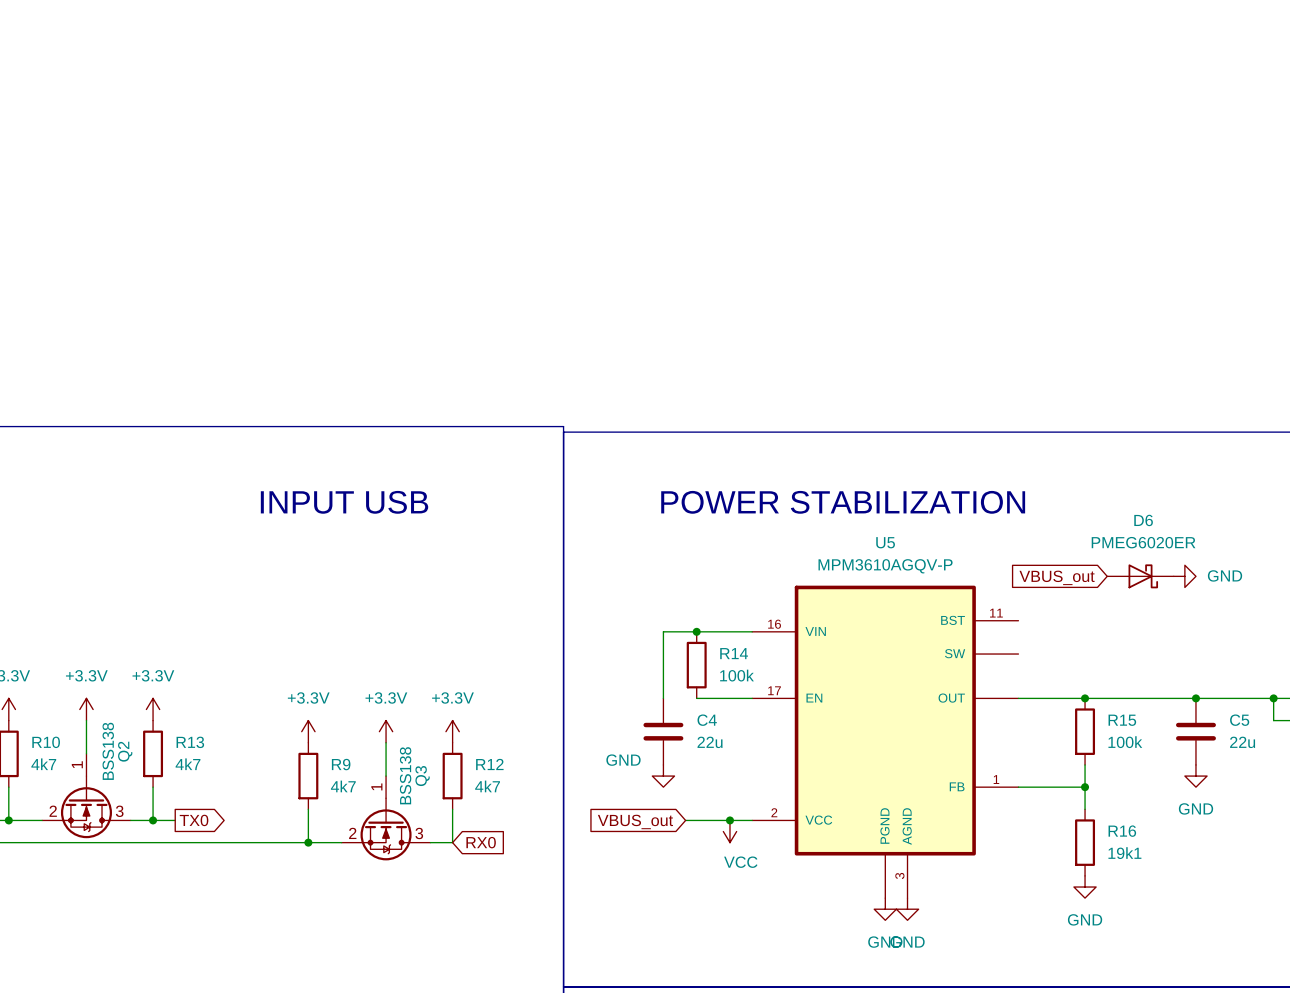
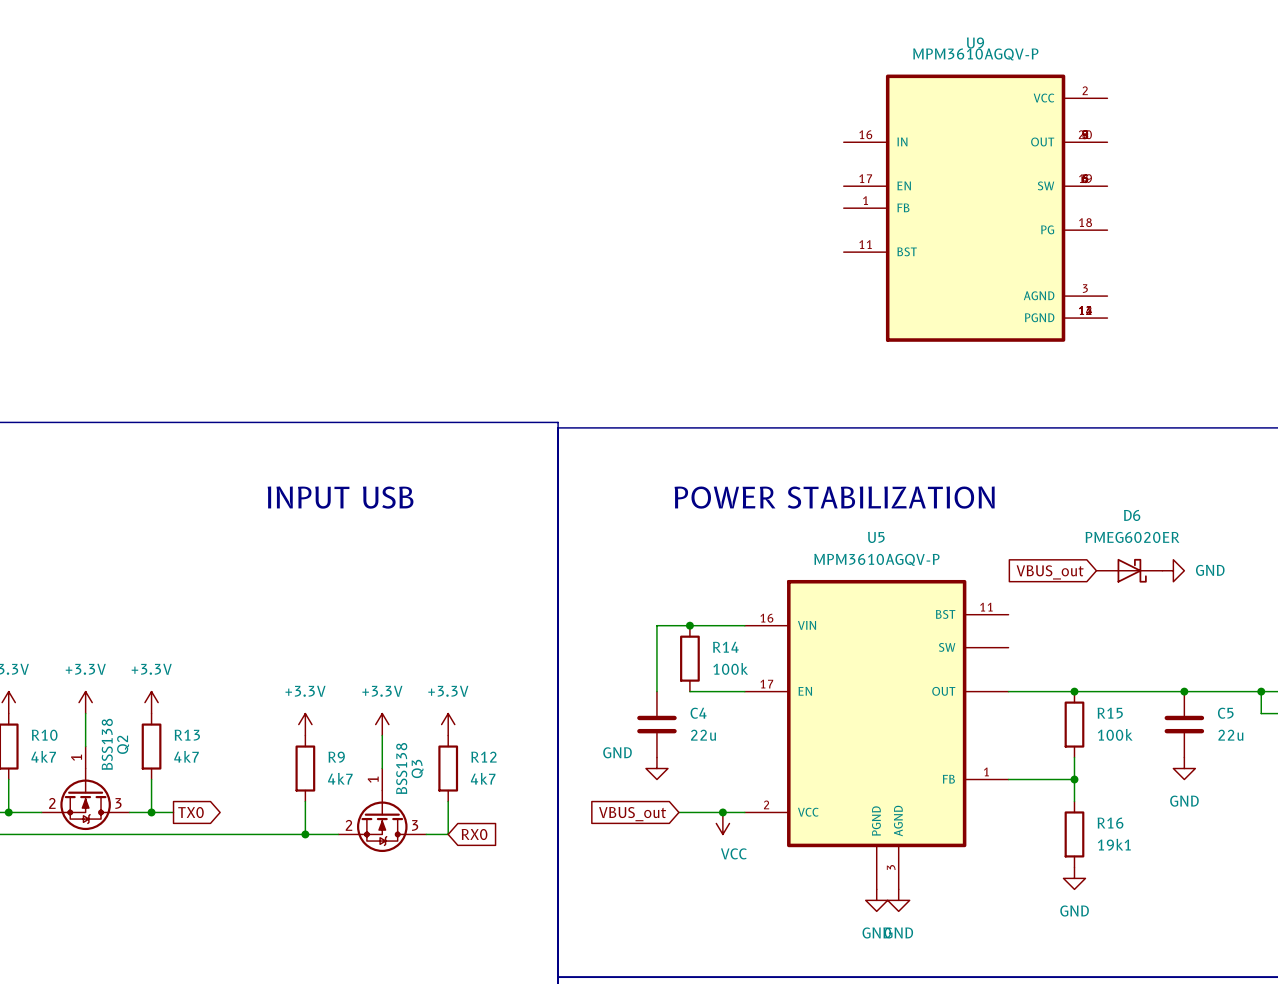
U9: none -> MPM3610AGQV-P (975, 208)

